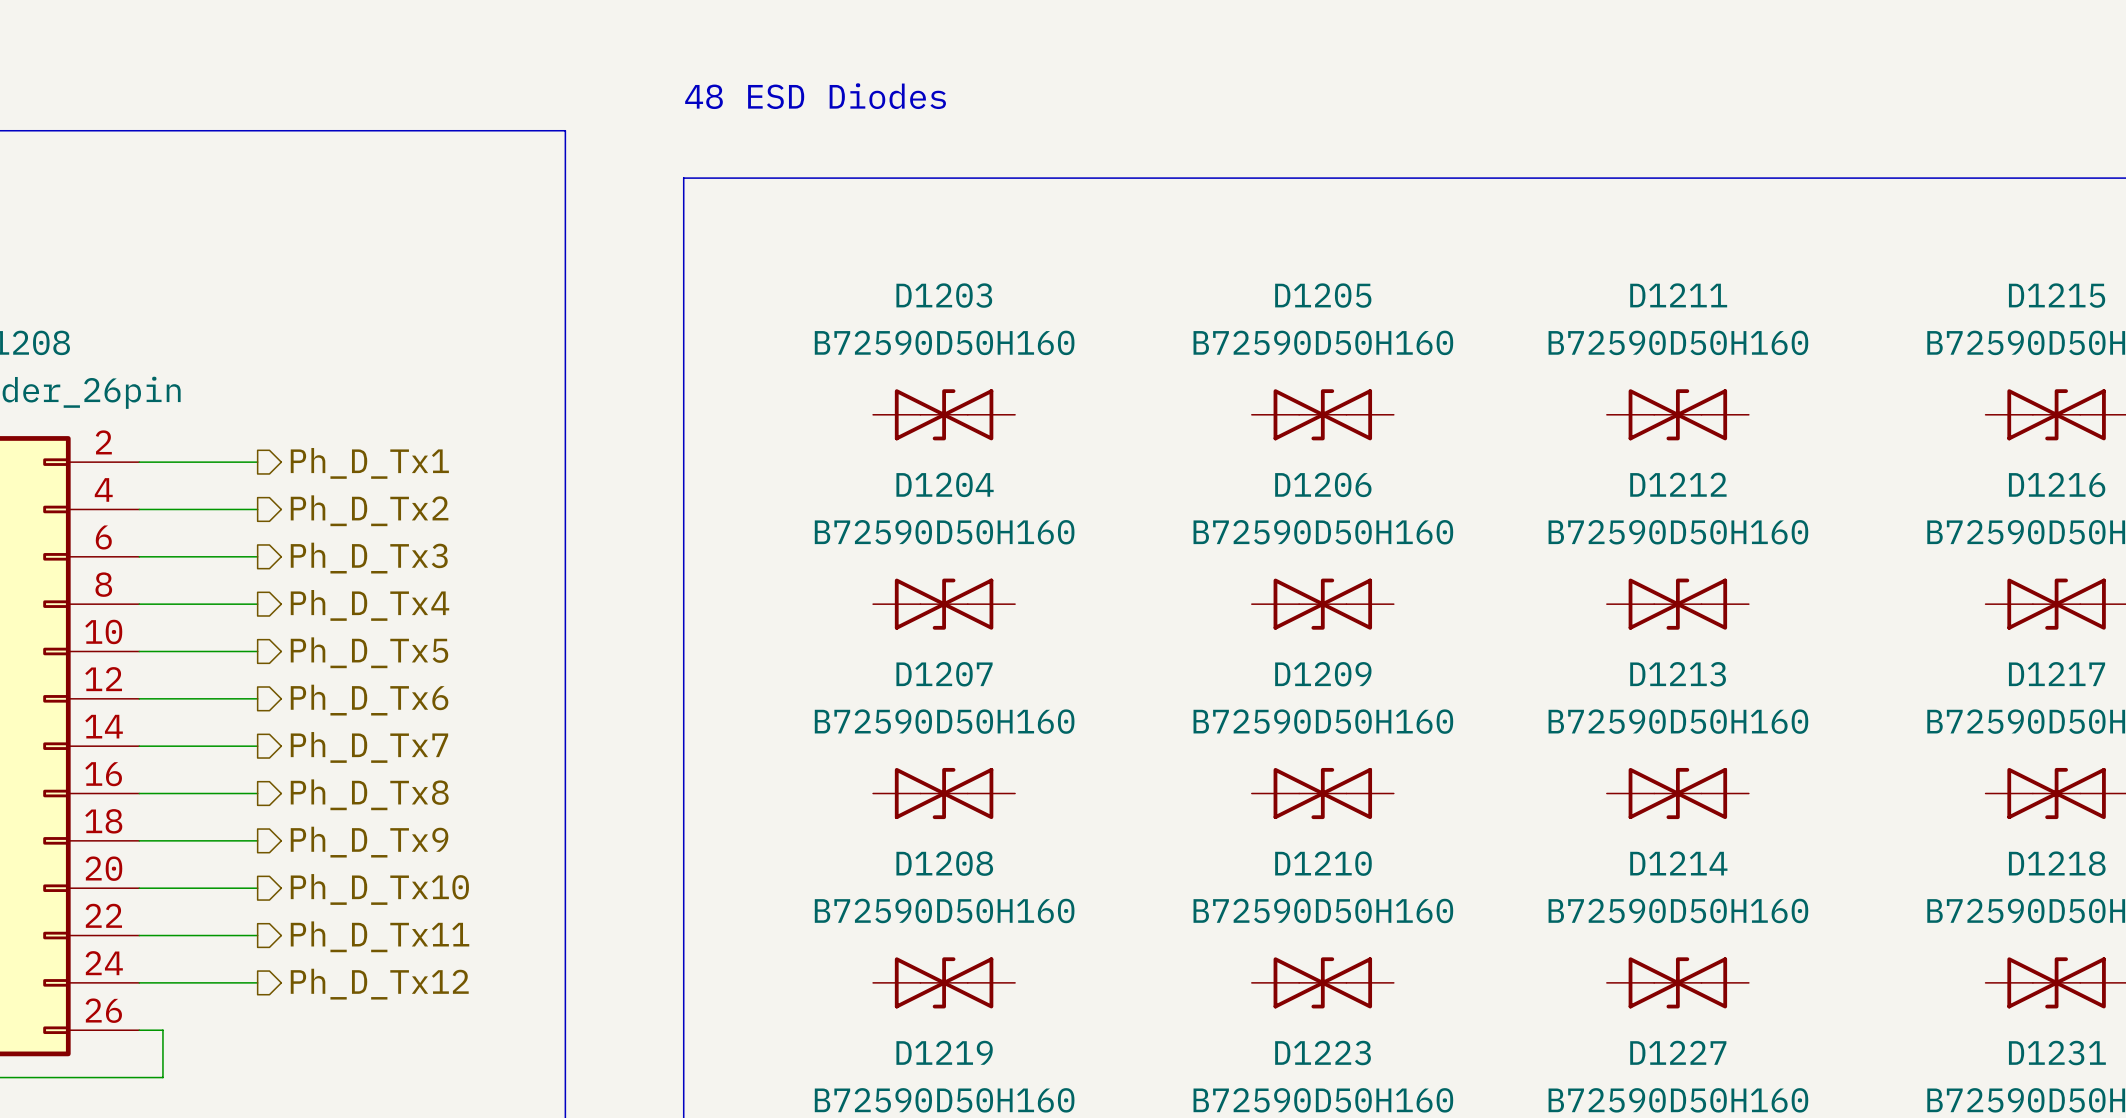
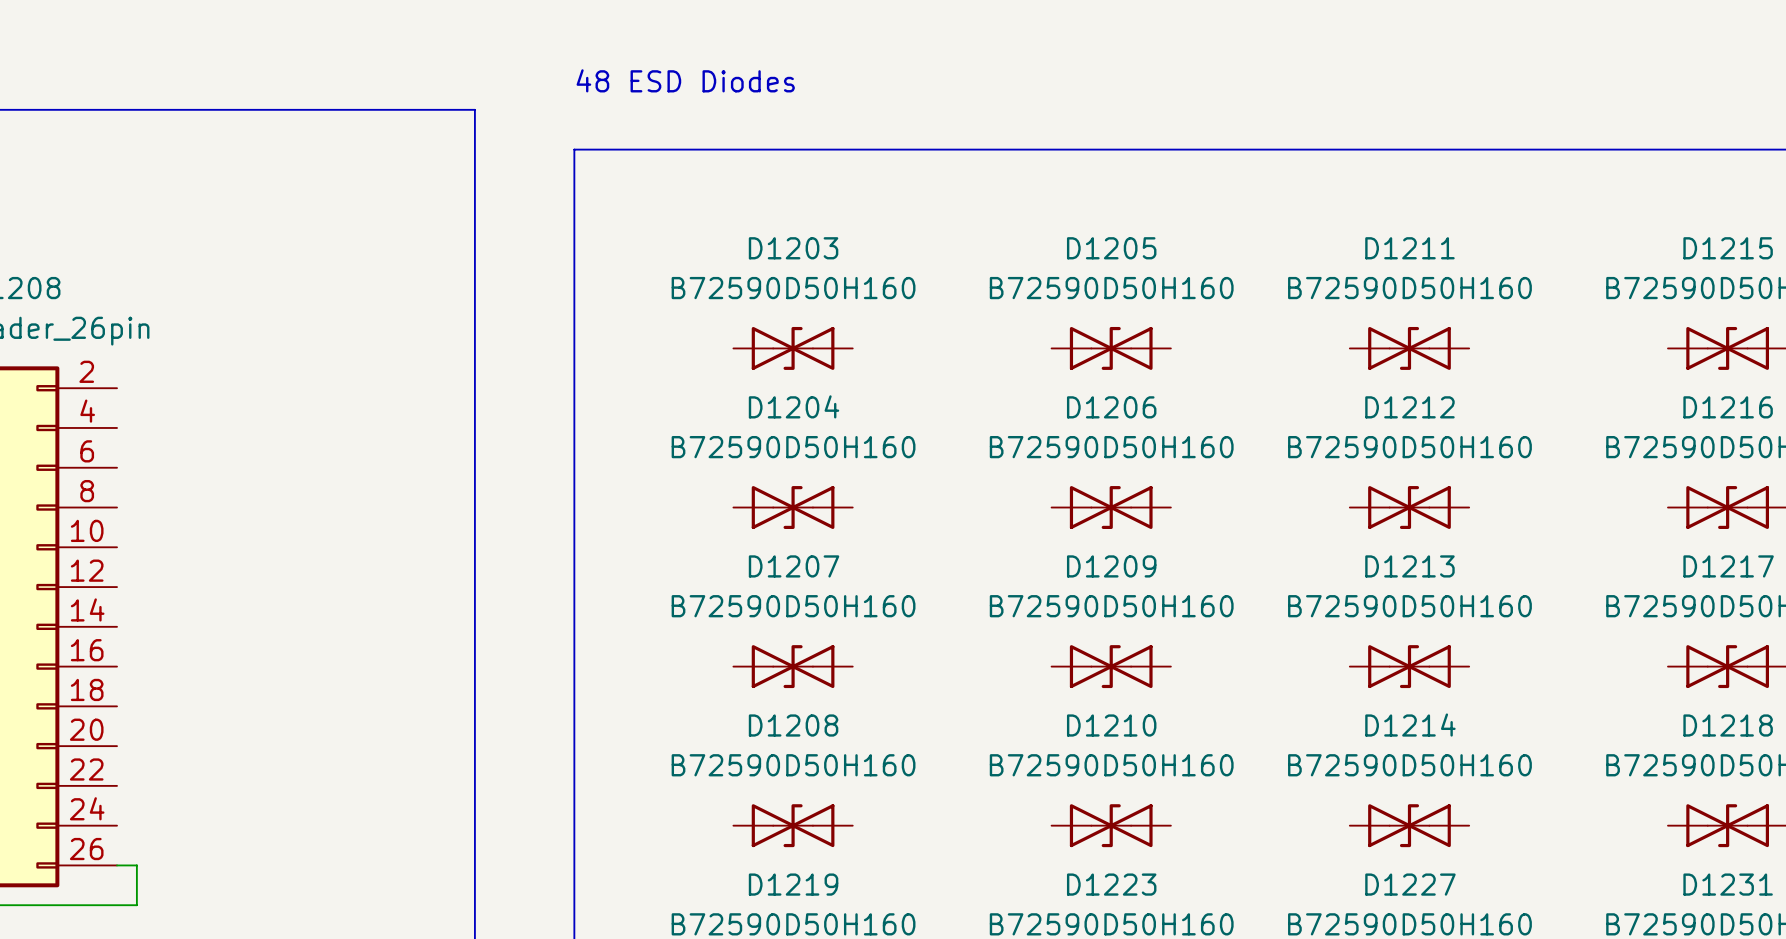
wire: (139, 462) (257, 462) -> none
hierarchical label: Ph_D_Tx1 (369, 463) -> none
wire: (139, 509) (257, 509) -> none
hierarchical label: Ph_D_Tx2 (369, 510) -> none
wire: (139, 556) (257, 556) -> none
hierarchical label: Ph_D_Tx3 (369, 558) -> none
wire: (139, 604) (257, 604) -> none
hierarchical label: Ph_D_Tx4 (369, 605) -> none
wire: (139, 651) (257, 651) -> none
hierarchical label: Ph_D_Tx5 (369, 652) -> none
wire: (139, 698) (257, 698) -> none
hierarchical label: Ph_D_Tx6 (369, 700) -> none
wire: (139, 746) (257, 746) -> none
hierarchical label: Ph_D_Tx7 (369, 747) -> none
wire: (139, 793) (257, 793) -> none
hierarchical label: Ph_D_Tx8 (369, 794) -> none
wire: (139, 840) (257, 840) -> none
hierarchical label: Ph_D_Tx9 (369, 842) -> none
wire: (139, 888) (257, 888) -> none
hierarchical label: Ph_D_Tx10 (379, 889) -> none
wire: (139, 935) (257, 935) -> none
hierarchical label: Ph_D_Tx11 (380, 936) -> none
wire: (139, 982) (257, 982) -> none
hierarchical label: Ph_D_Tx12 (379, 984) -> none

